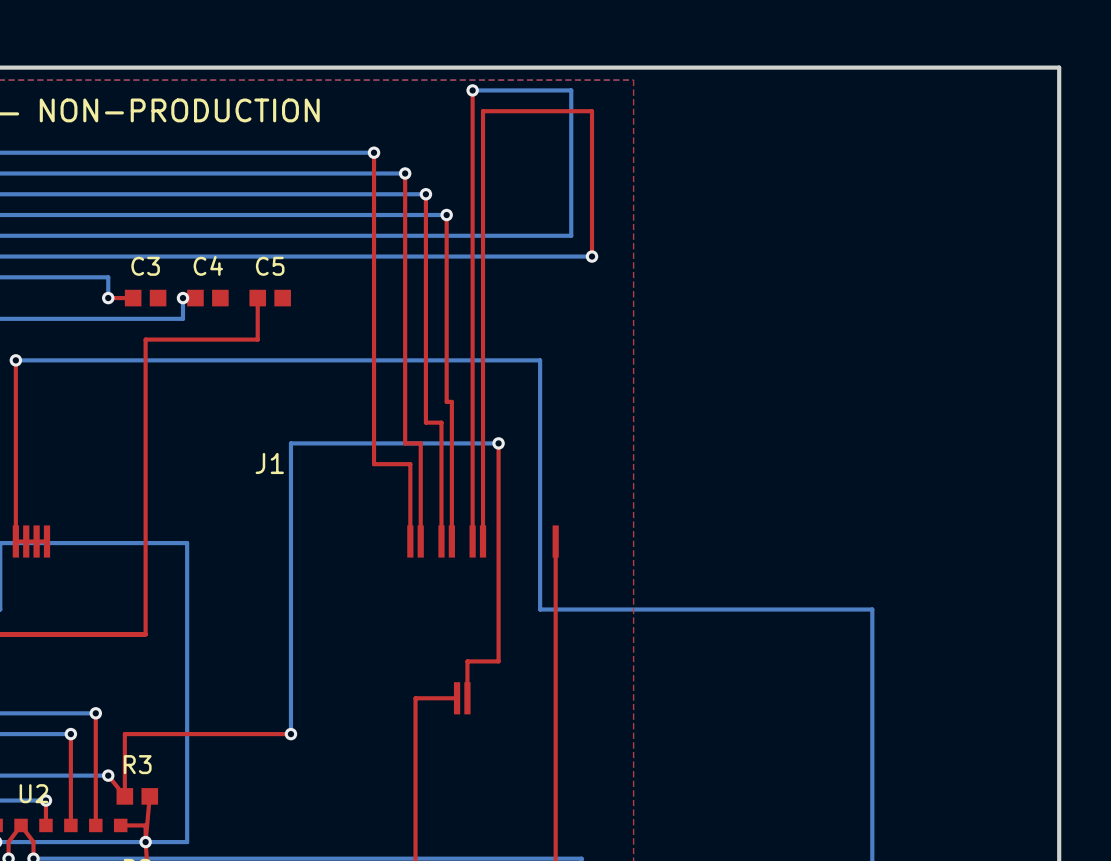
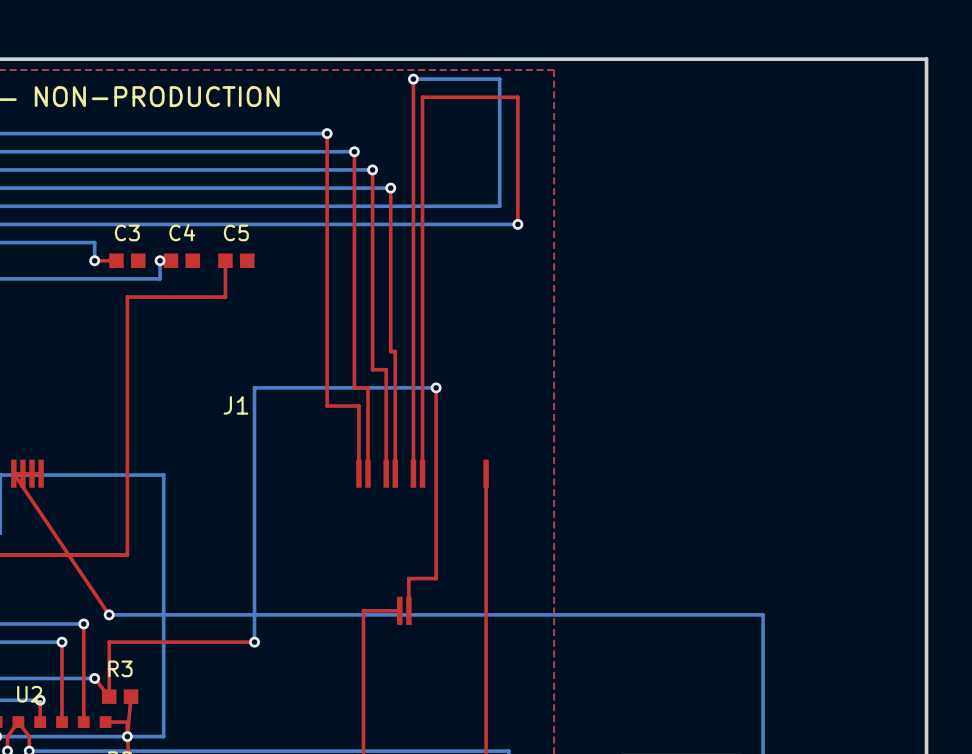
top track: (15, 360) (15, 541) -> (109, 614) (13, 473)
bottom track: (15, 360) (540, 360) (540, 609) (872, 609) (872, 702) -> (109, 614) (763, 614)
via: (15, 360) -> none
via: none -> (109, 614)

